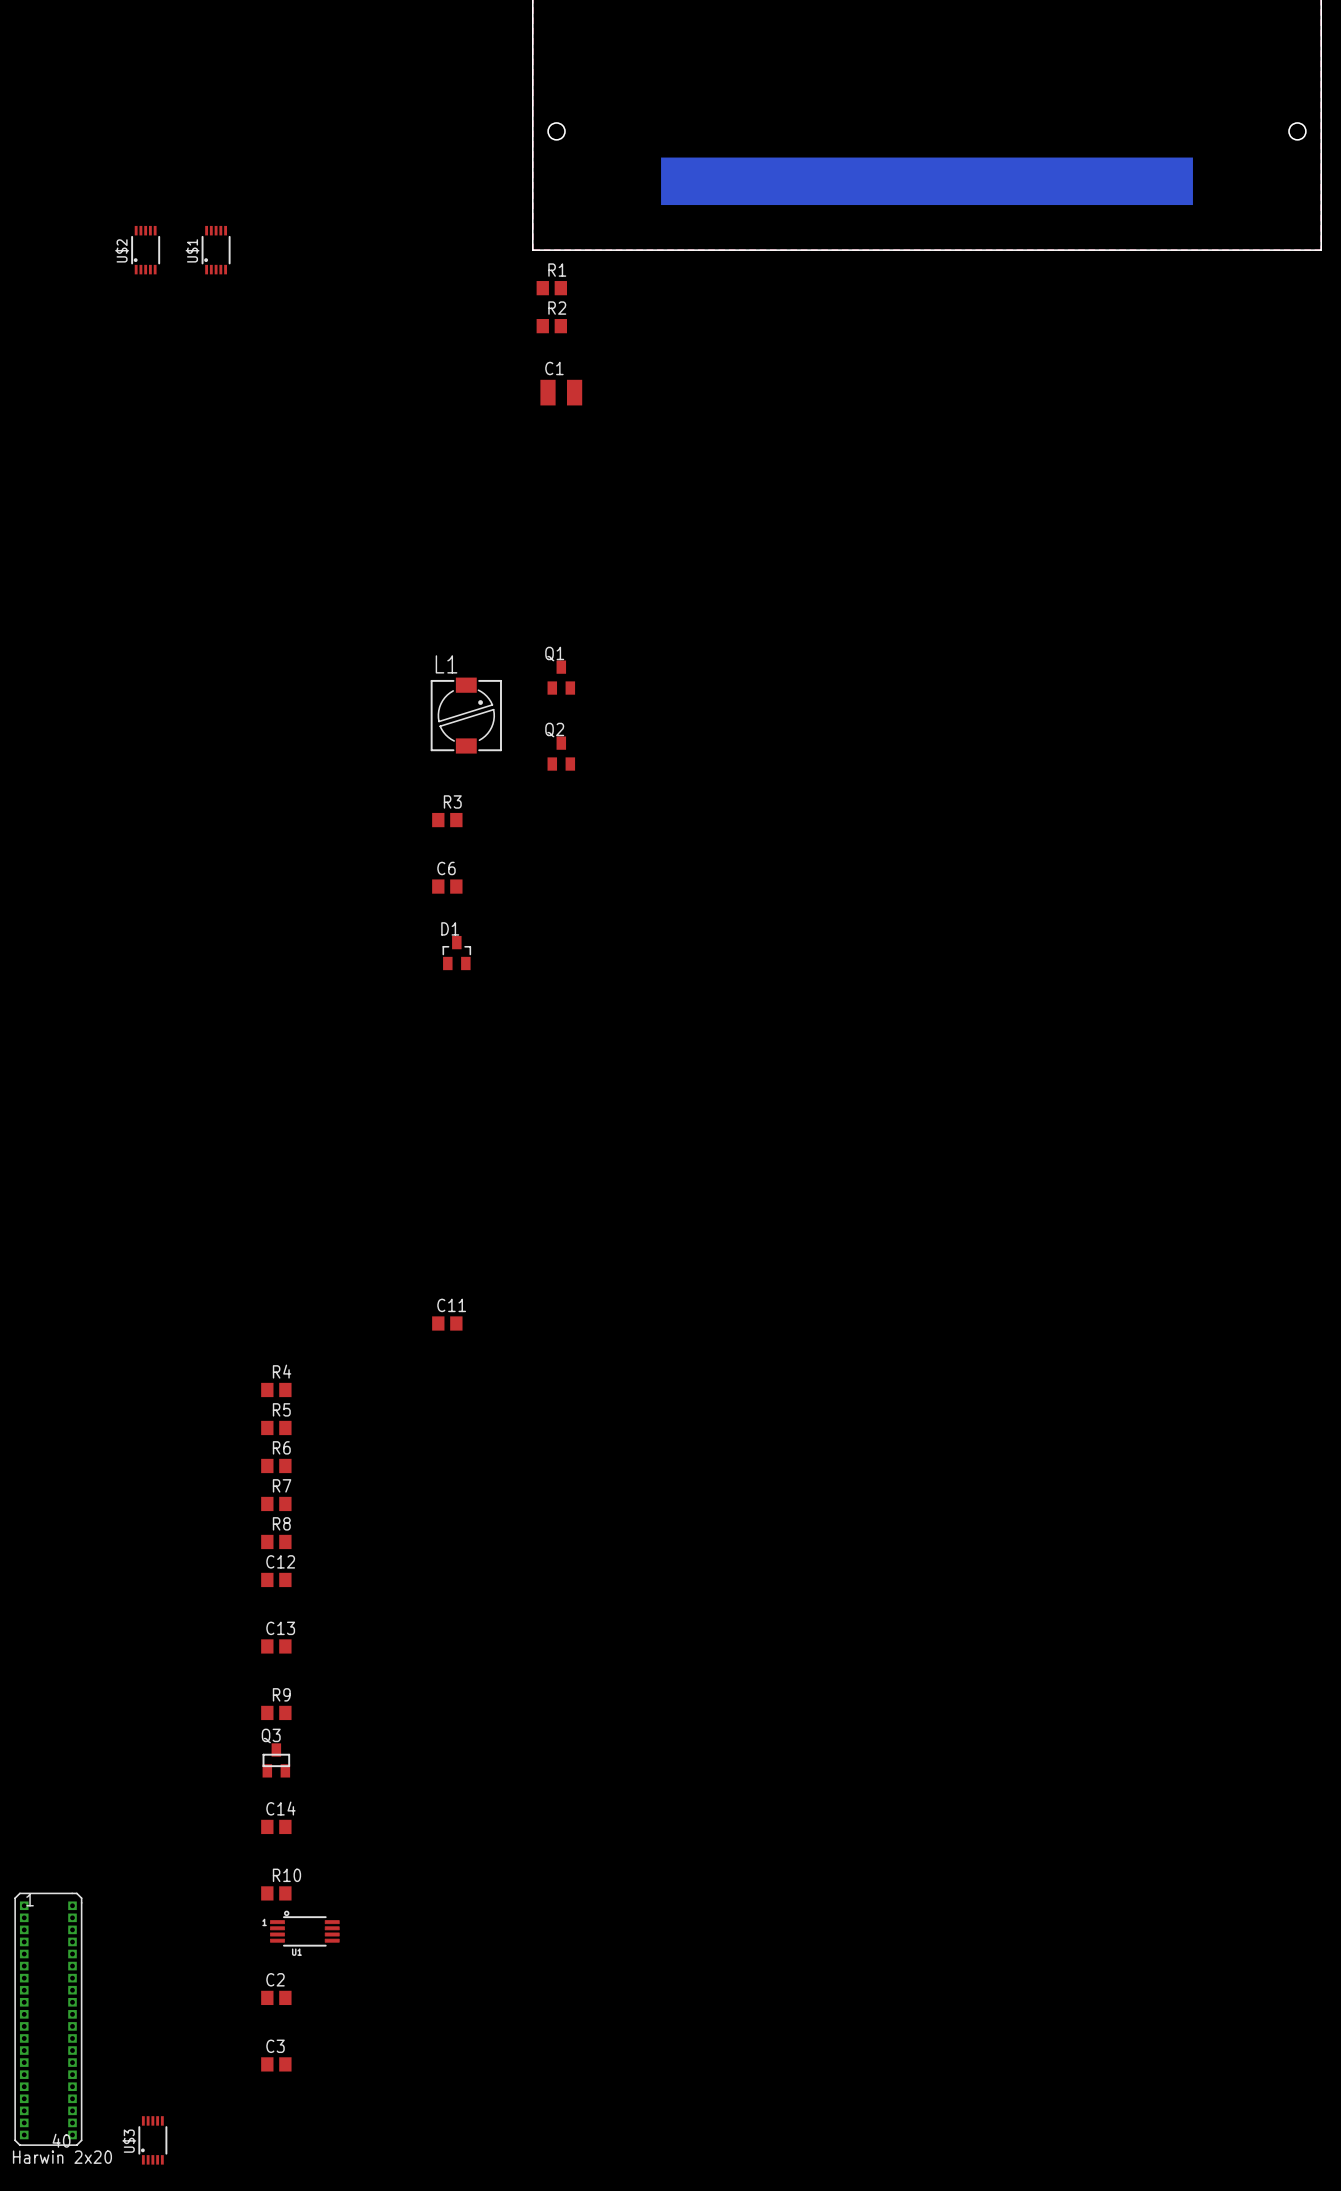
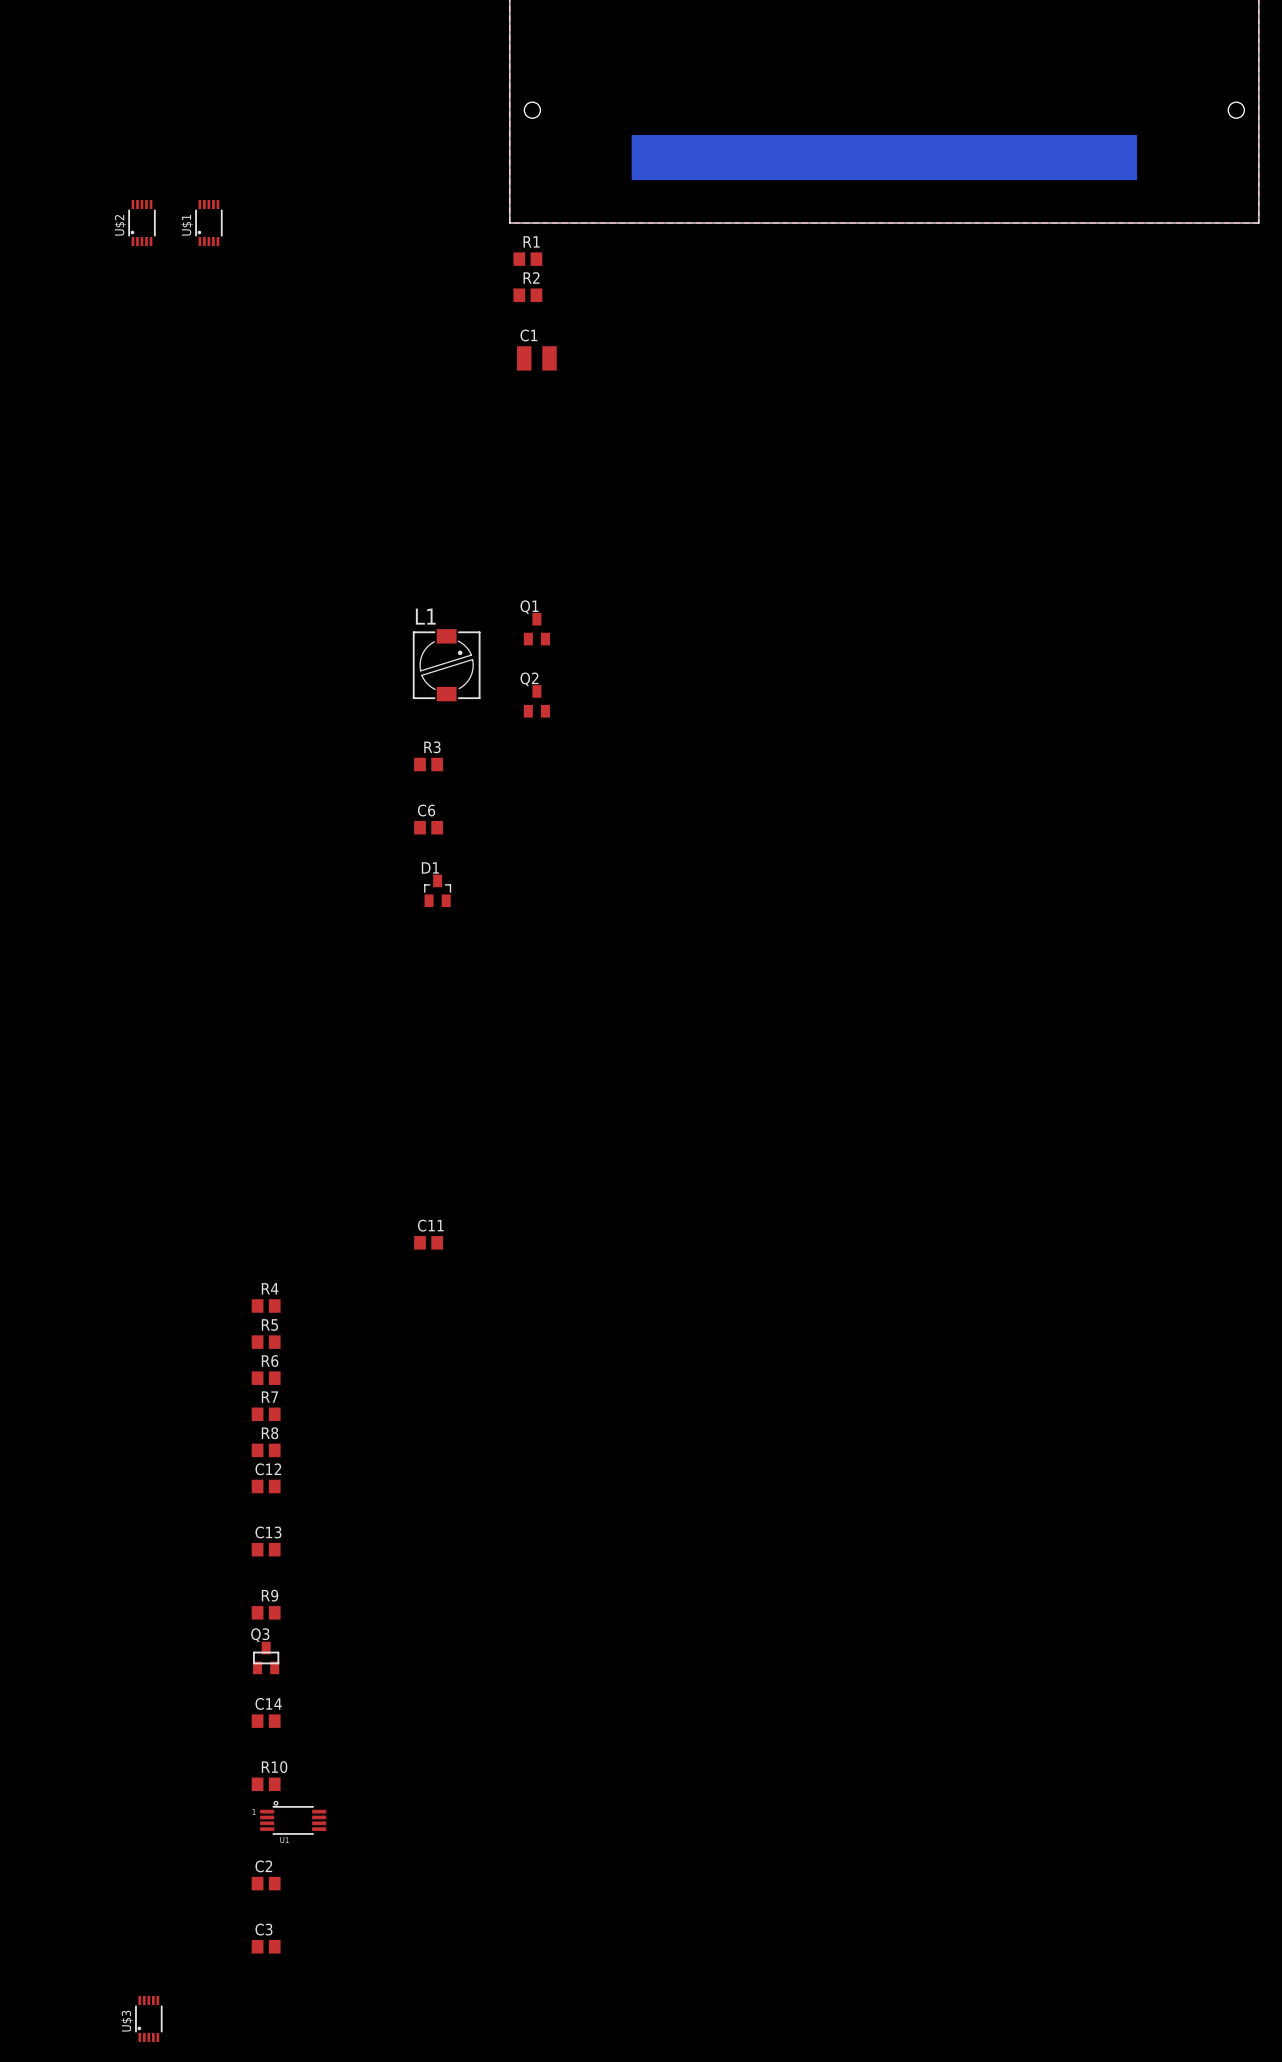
part: (48, 2019) -> none

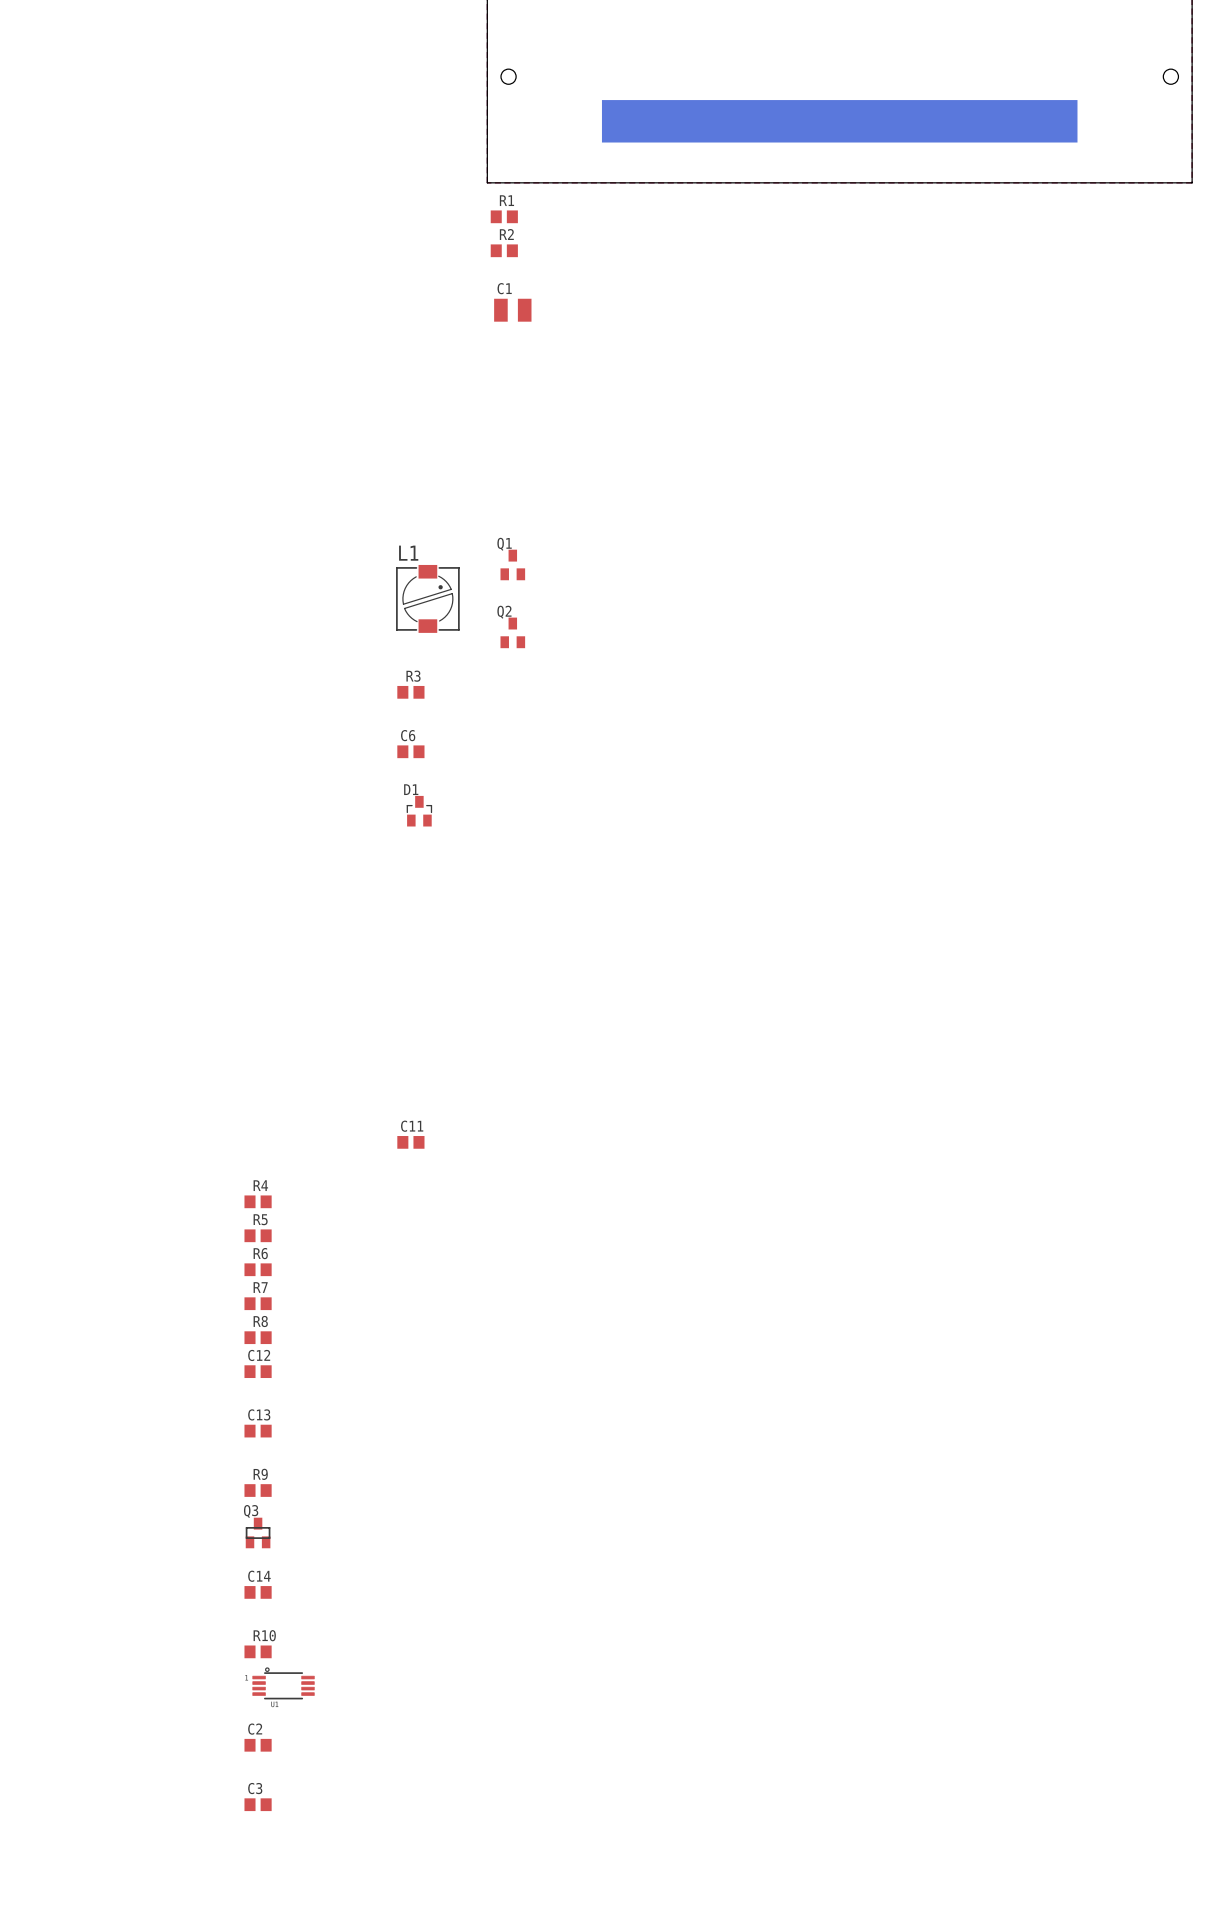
U$2: (141, 223) -> none
U$1: (208, 223) -> none
U$3: (148, 2018) -> none

